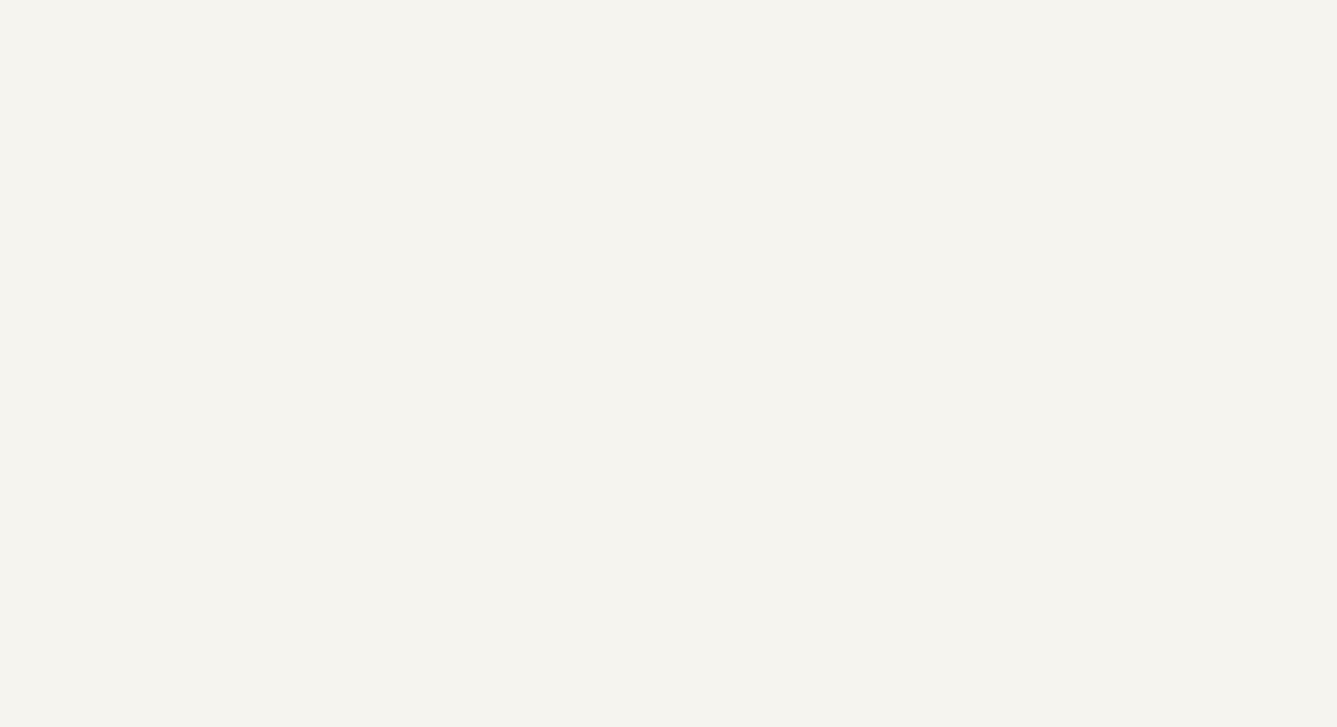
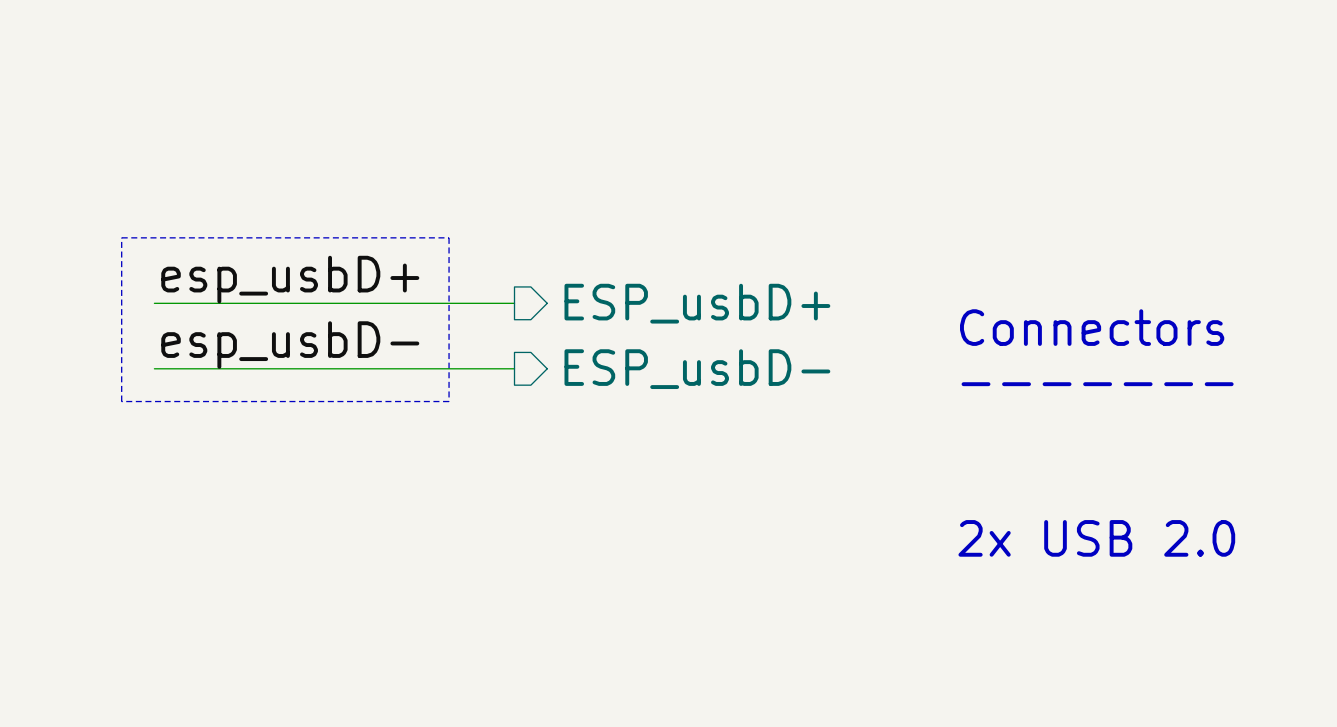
line: none -> (121, 237) (449, 237) (449, 401) (121, 401) (121, 237)
label: none -> esp_usbD+ (290, 279)
wire: none -> (154, 303) (514, 303)
sheet pin: none -> ESP_usbD+ (697, 303)
text: none -> Connectors (1092, 327)
label: none -> esp_usbD- (290, 345)
wire: none -> (154, 368) (514, 368)
sheet pin: none -> ESP_usbD- (697, 369)
text: none -> ------- (1097, 384)
text: none -> 2x USB 2.0 (1096, 538)

